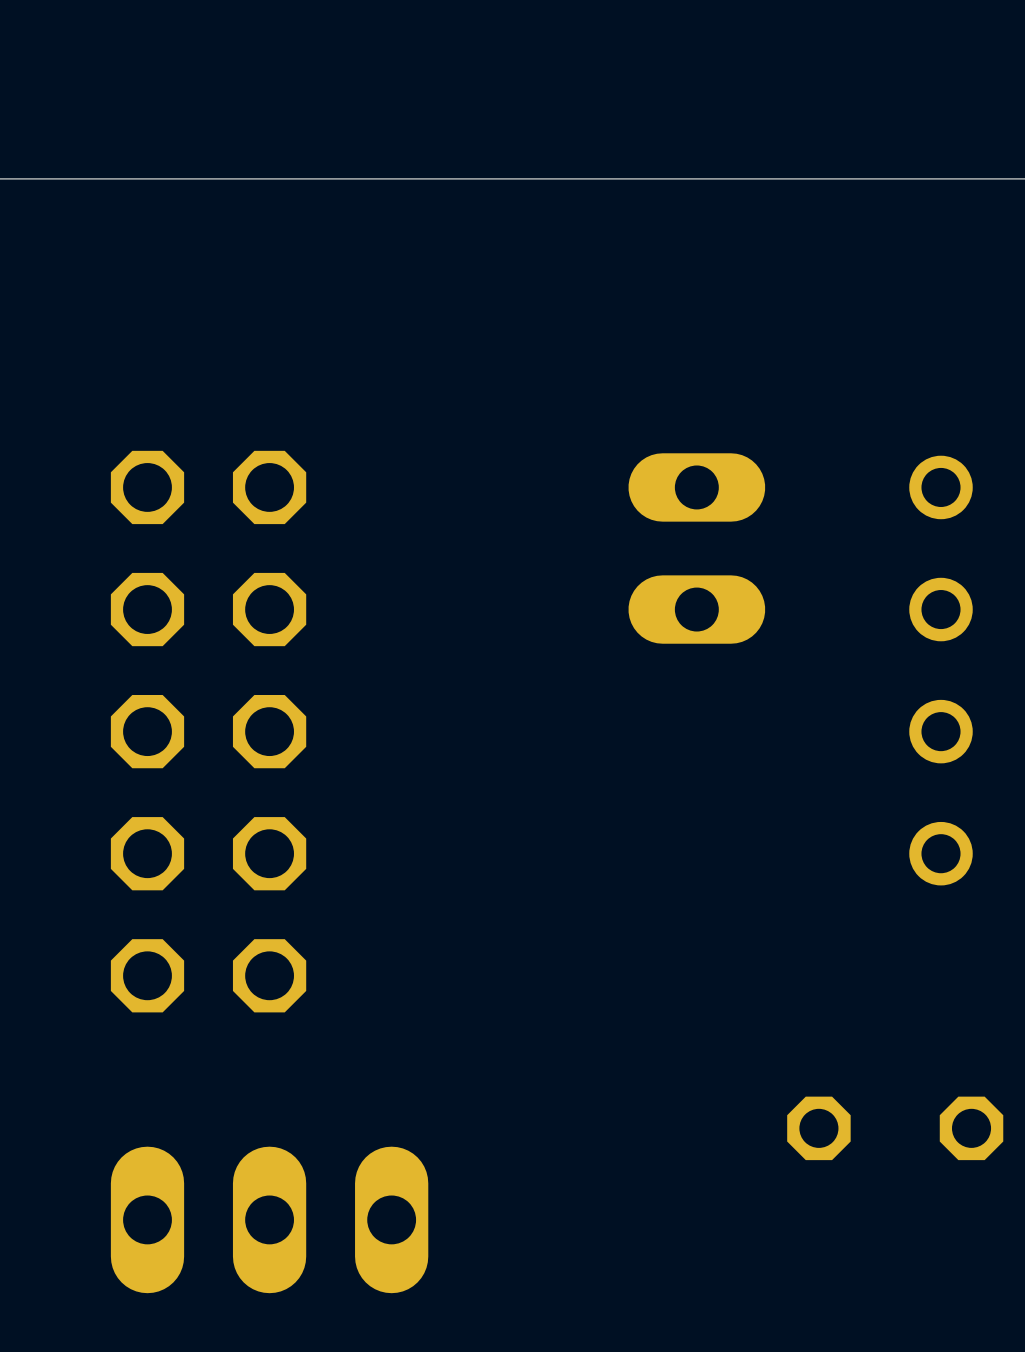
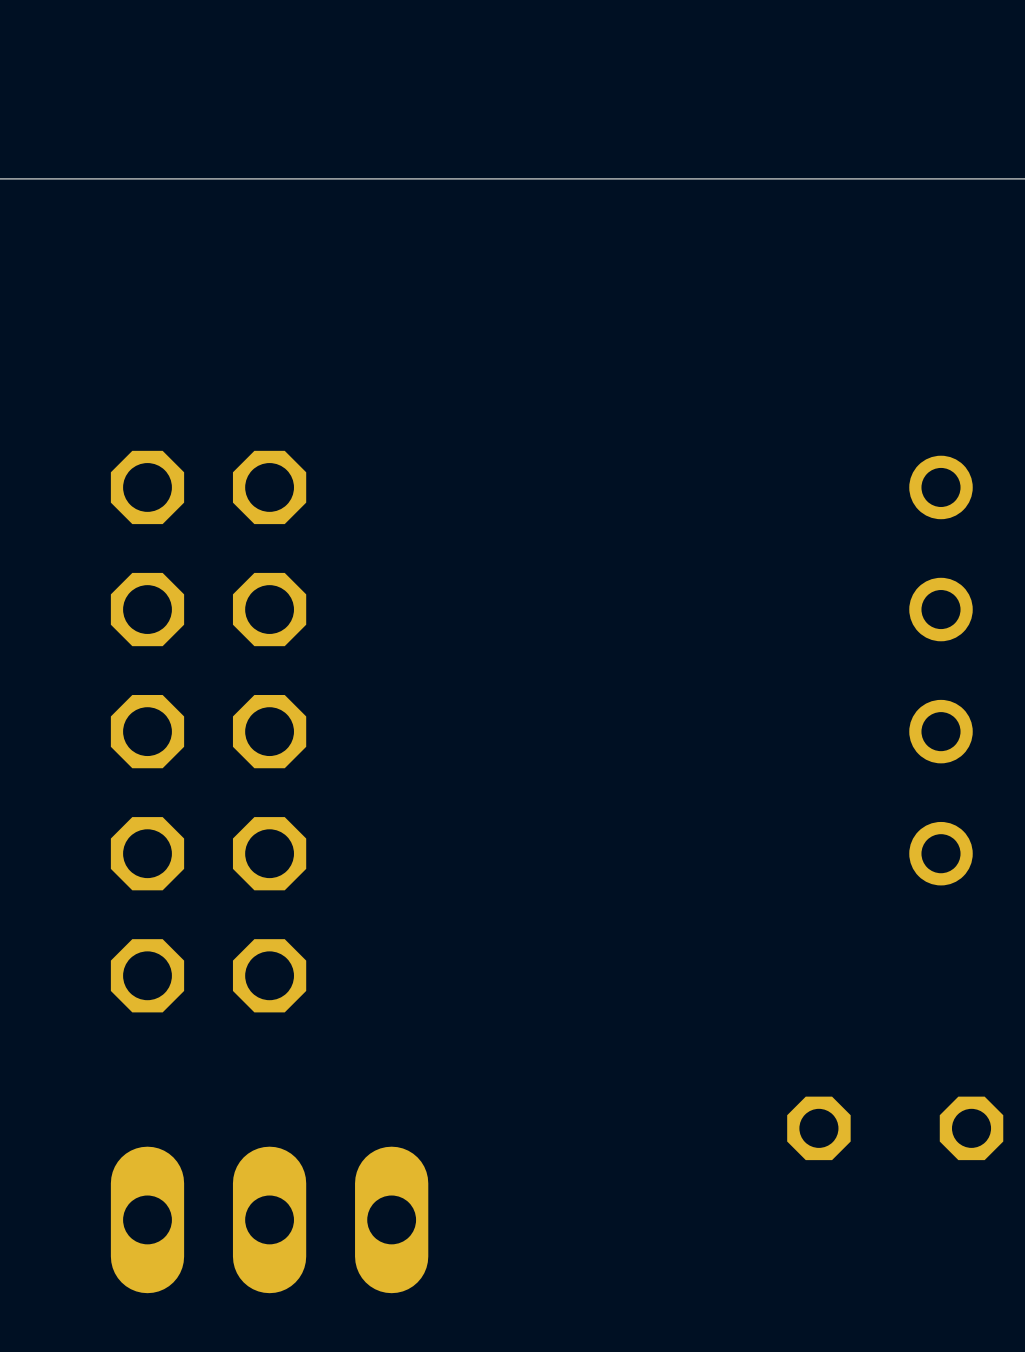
part: (696, 548) -> none

